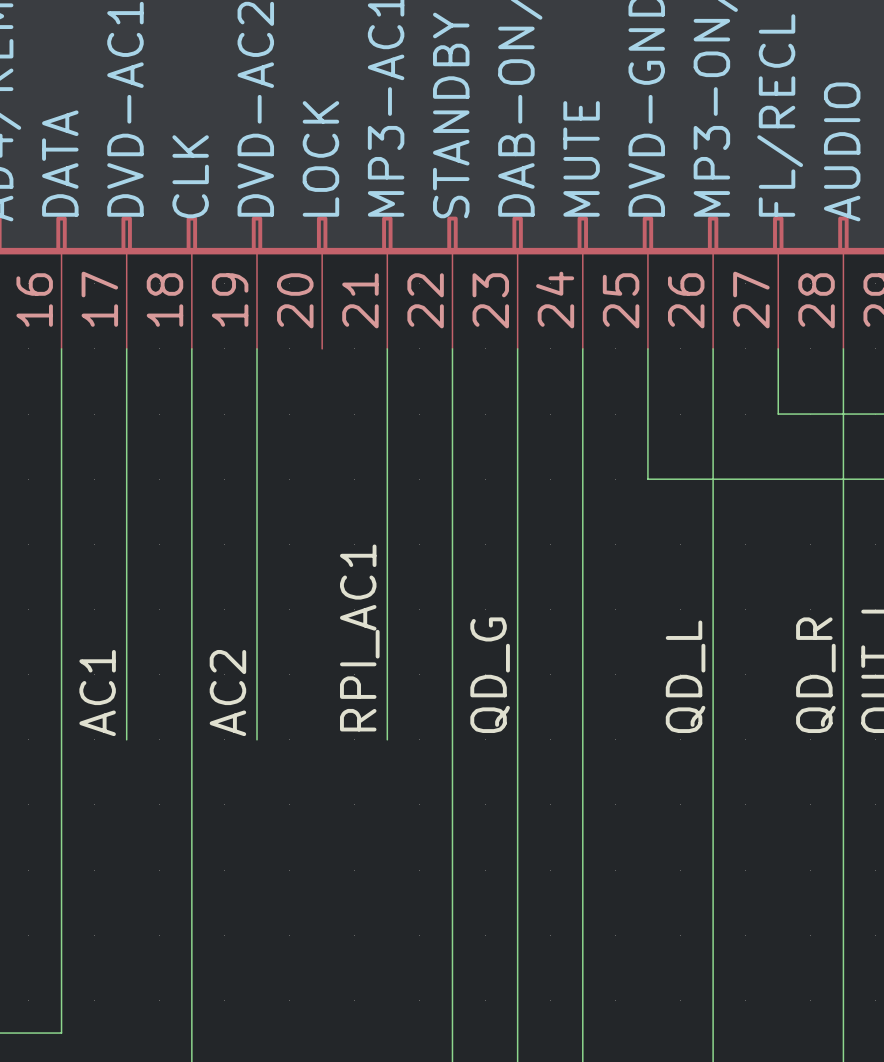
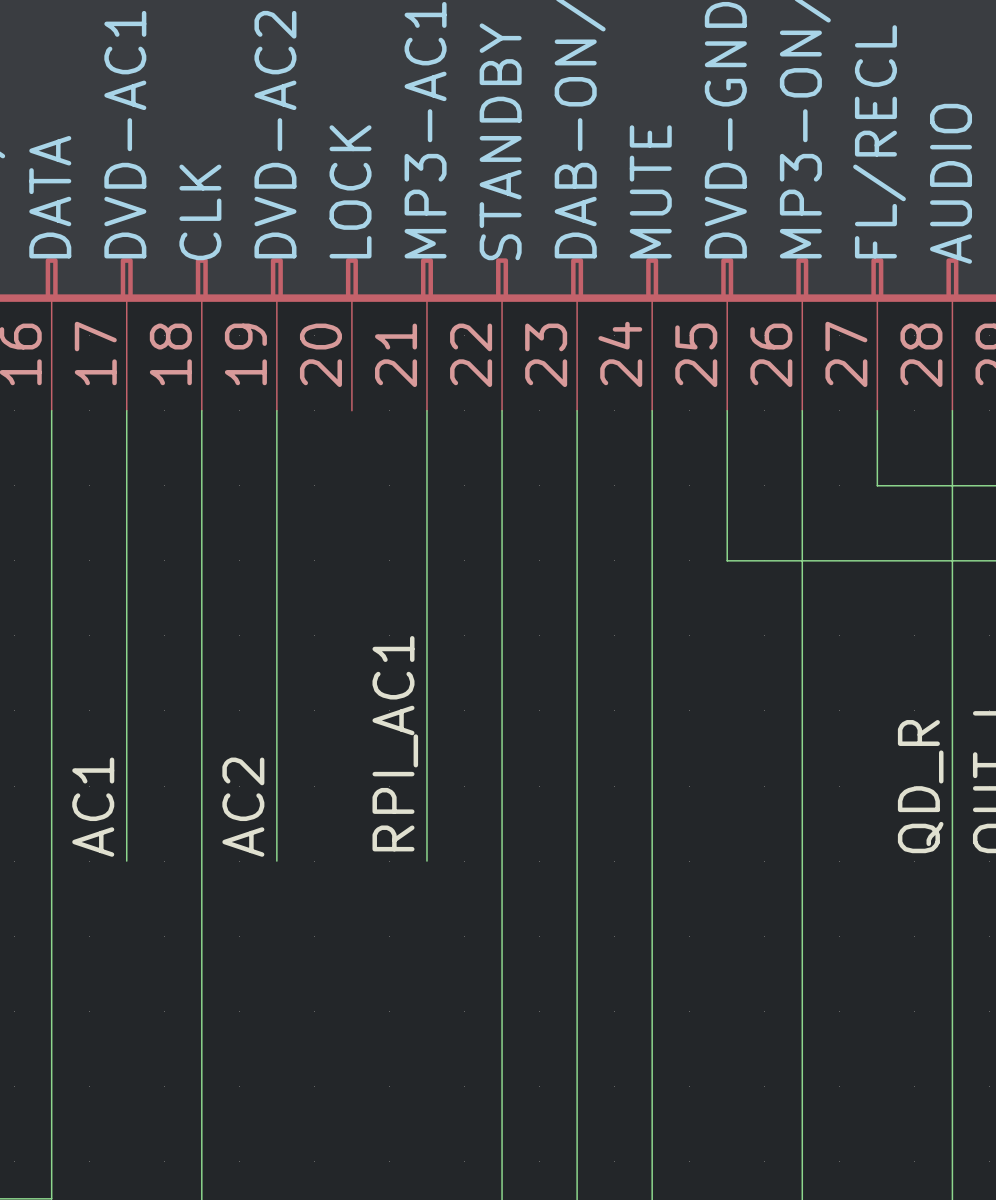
label: QD_G (490, 675) -> none
label: QD_L (685, 676) -> none

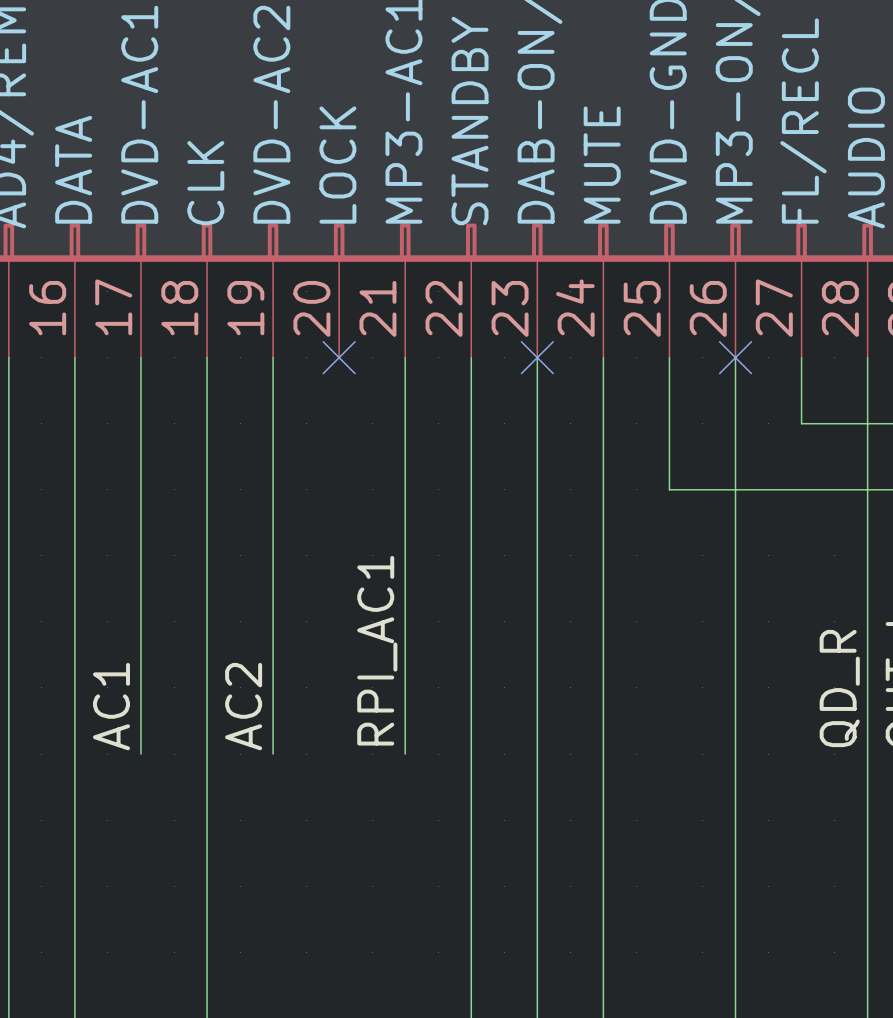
no-connect mark: none -> (339, 357)
no-connect mark: none -> (537, 357)
no-connect mark: none -> (735, 357)

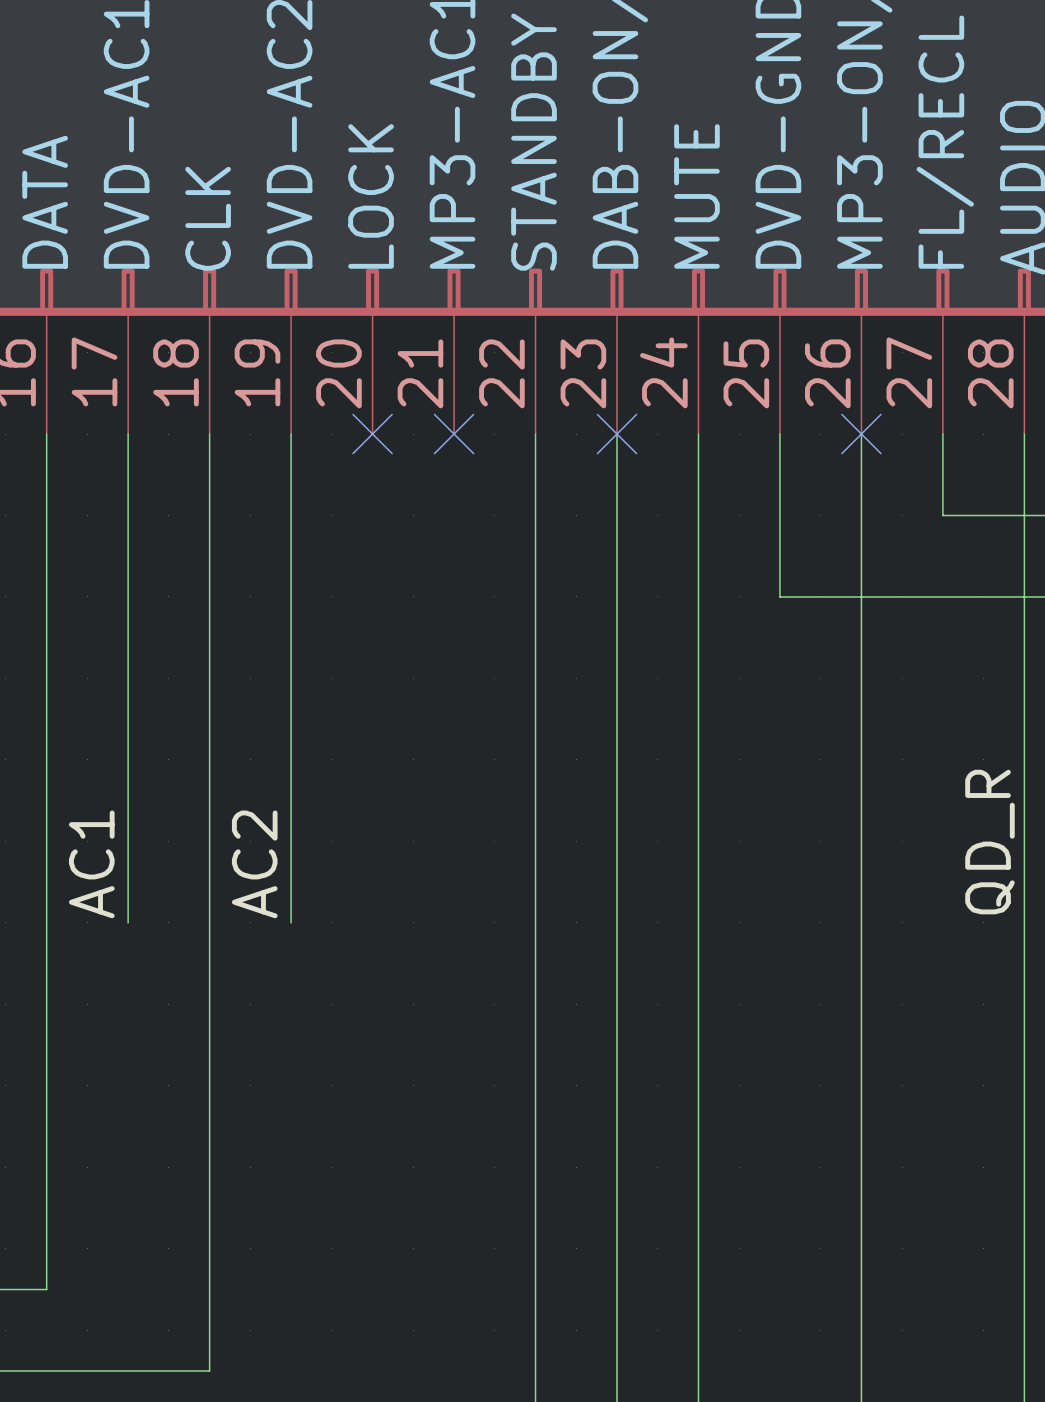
wire: (405, 357) (405, 754) -> none
no-connect mark: none -> (454, 434)
label: RPI_AC1 (377, 650) -> none

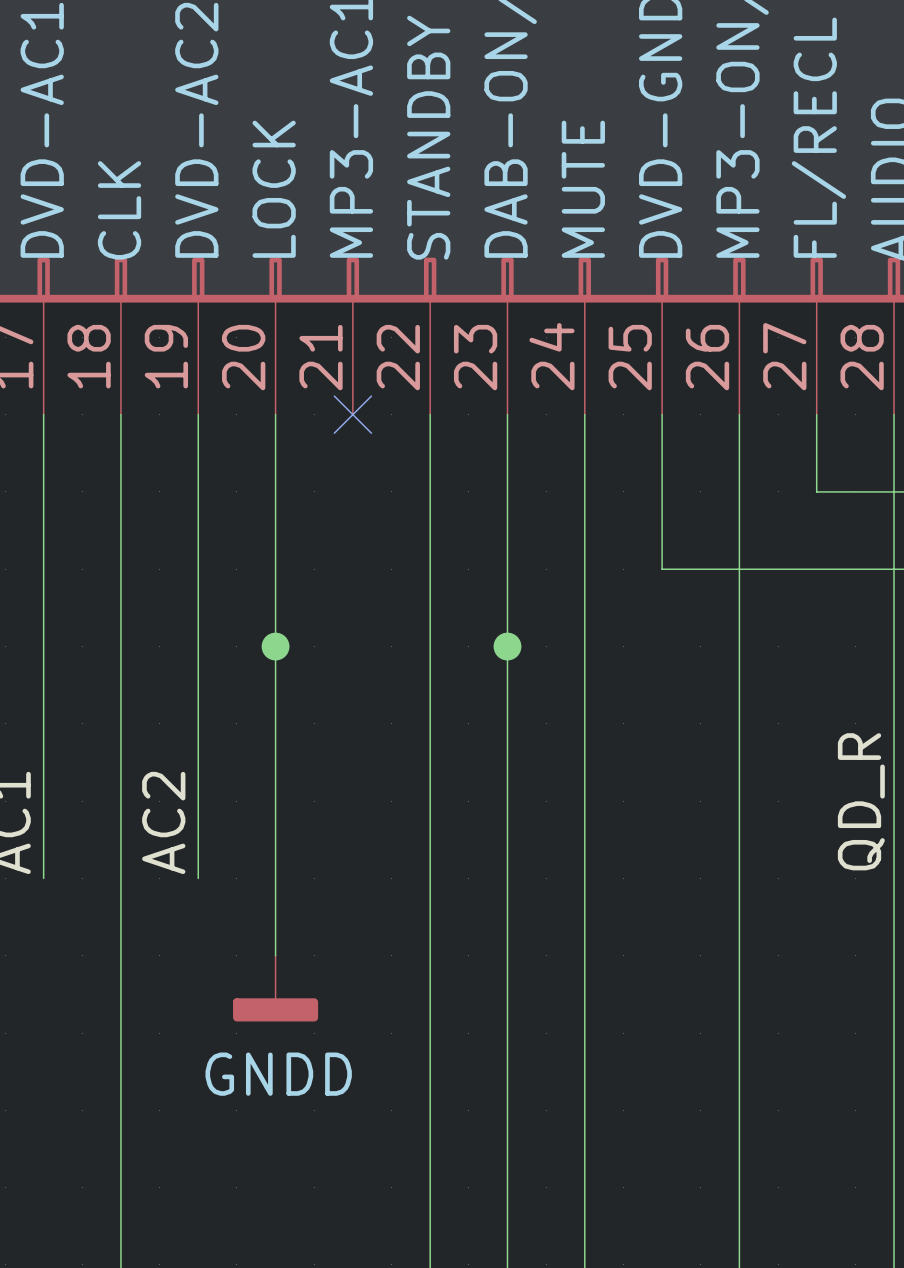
wire: none -> (275, 414) (275, 955)
no-connect mark: (372, 434) -> none
no-connect mark: (617, 434) -> none
no-connect mark: (861, 434) -> none
junction: none -> (275, 646)
junction: none -> (507, 646)
power symbol: none -> GNDD (275, 988)

